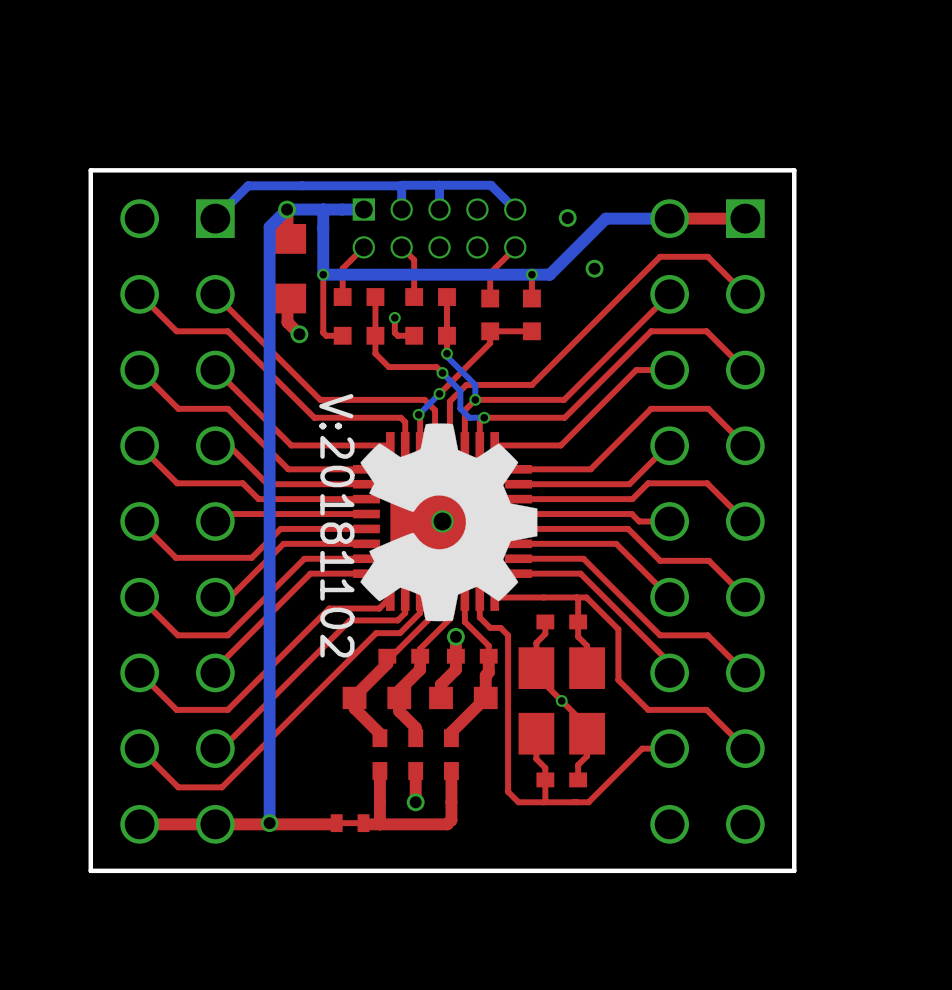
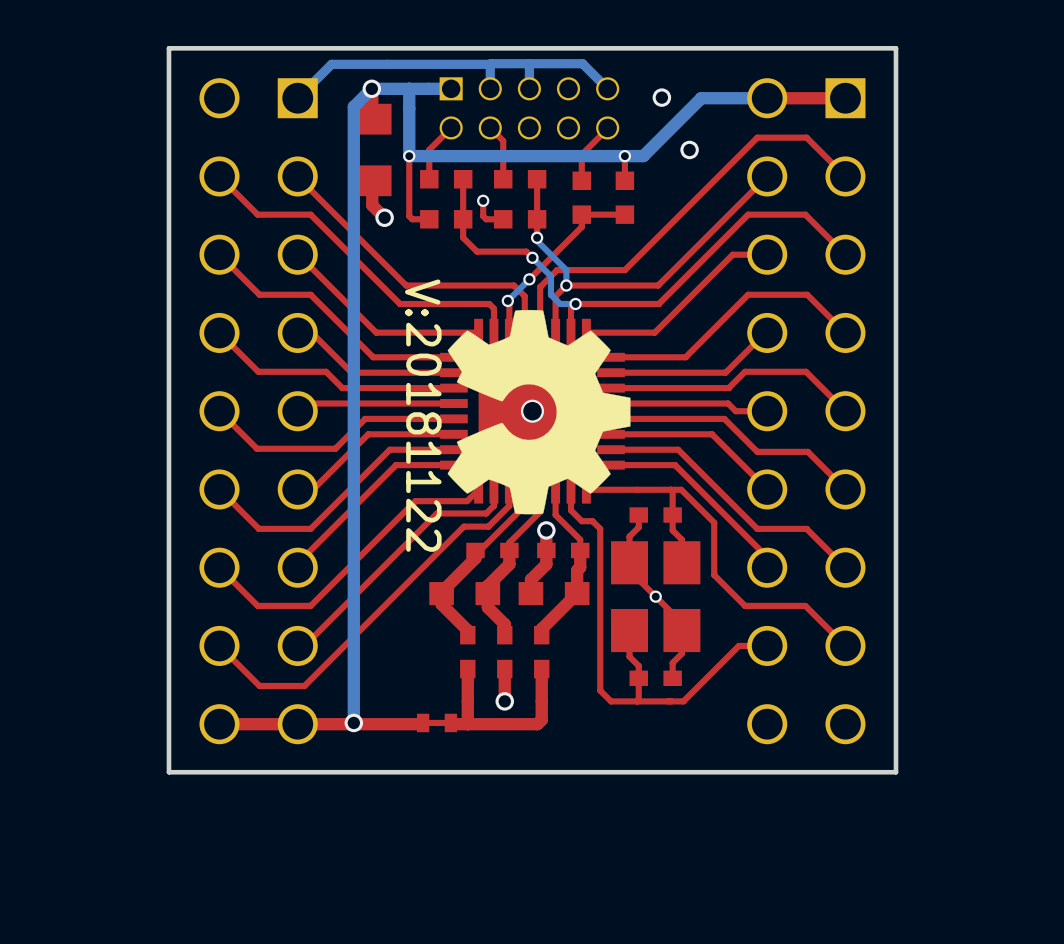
drawing shape: [319, 394, 355, 658] -> [405, 279, 442, 552]

